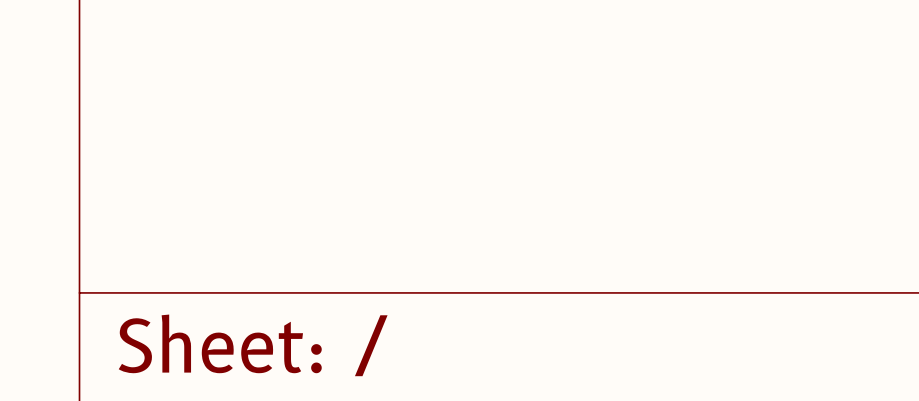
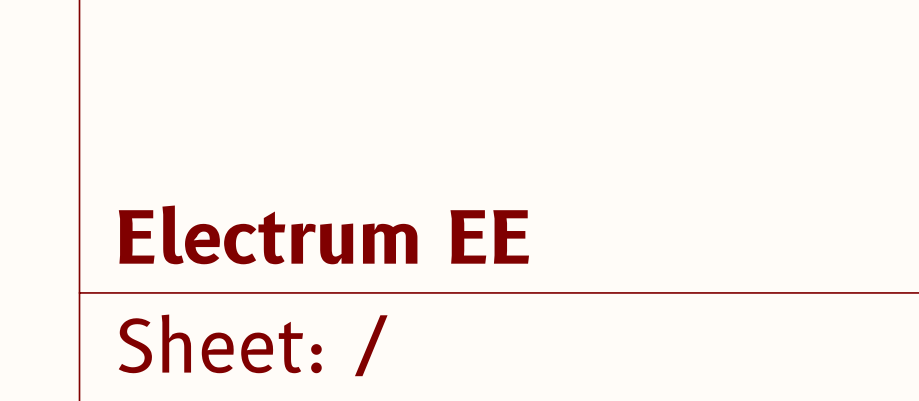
title block: none -> Electrum EE (323, 234)

